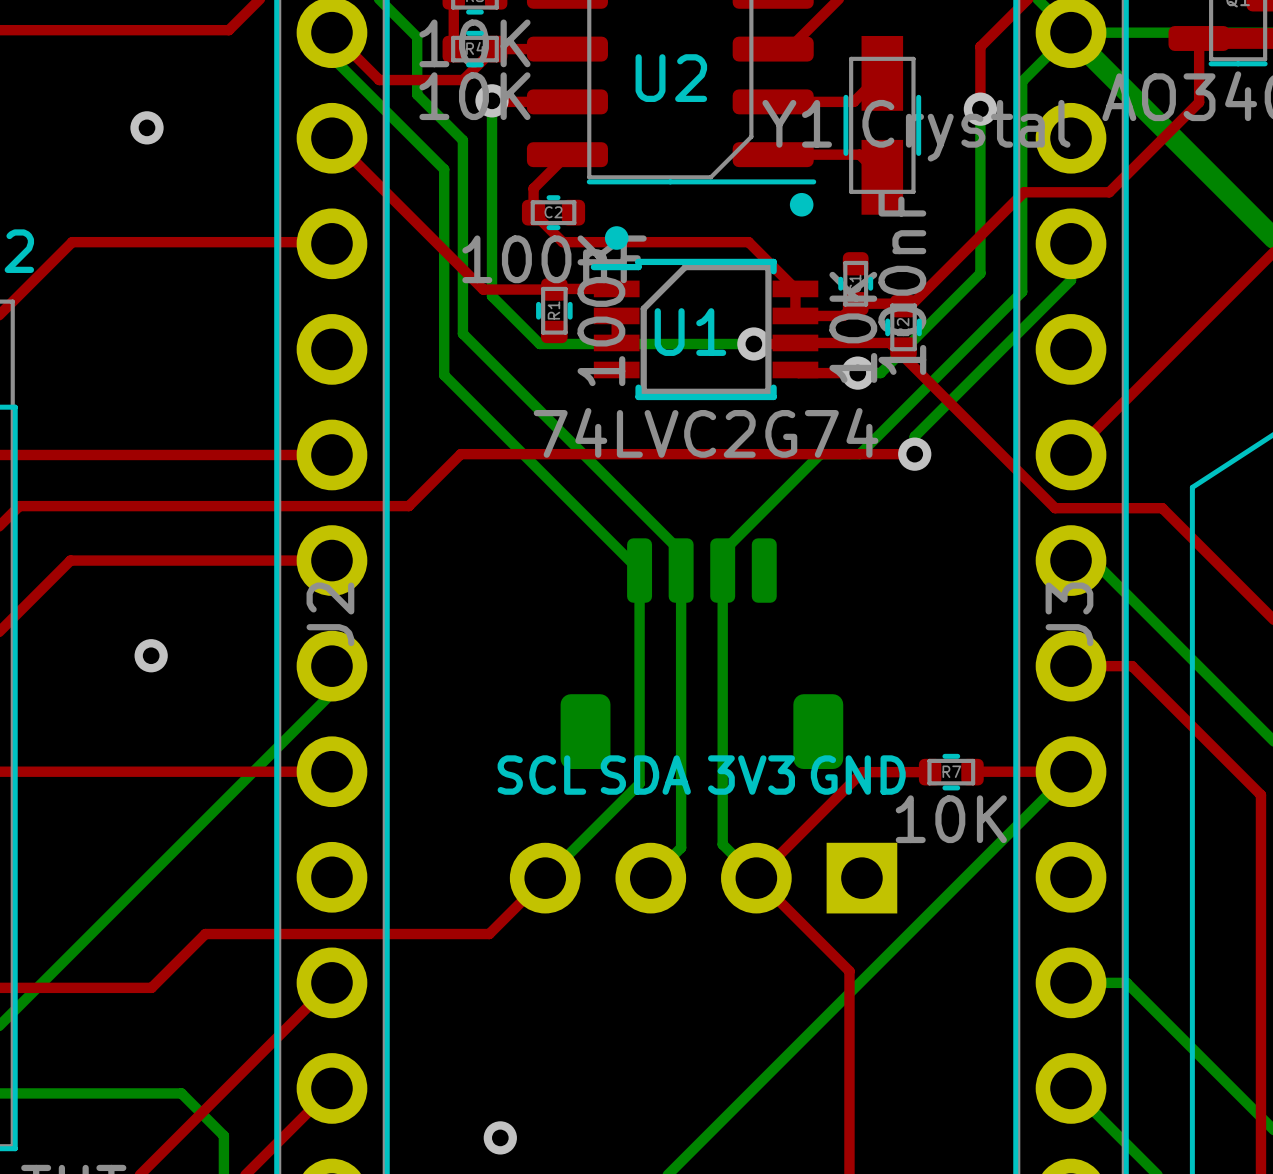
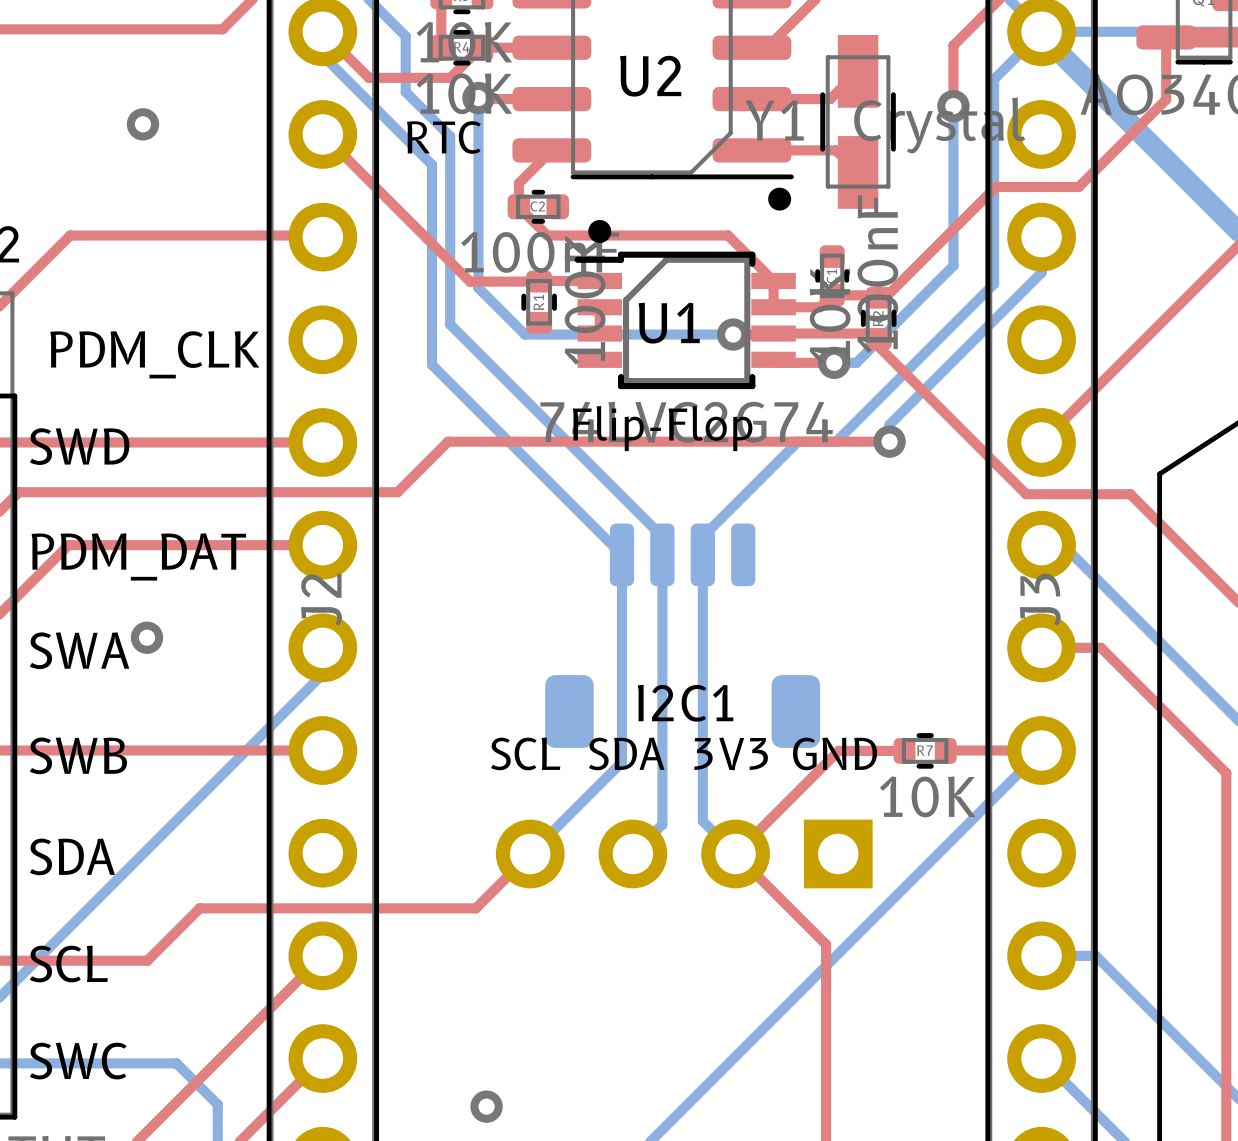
text: none -> RTC (443, 137)
text: none -> PDM_CLK (154, 354)
text: none -> Flip-Flop (662, 428)
text: none -> SWD (79, 446)
text: none -> PDM_DAT (138, 556)
text: none -> SWA (79, 650)
text: none -> I2C1 (685, 703)
text: none -> SWB (78, 755)
text: none -> SDA (72, 856)
text: none -> SCL (68, 964)
text: none -> SWC (78, 1061)

